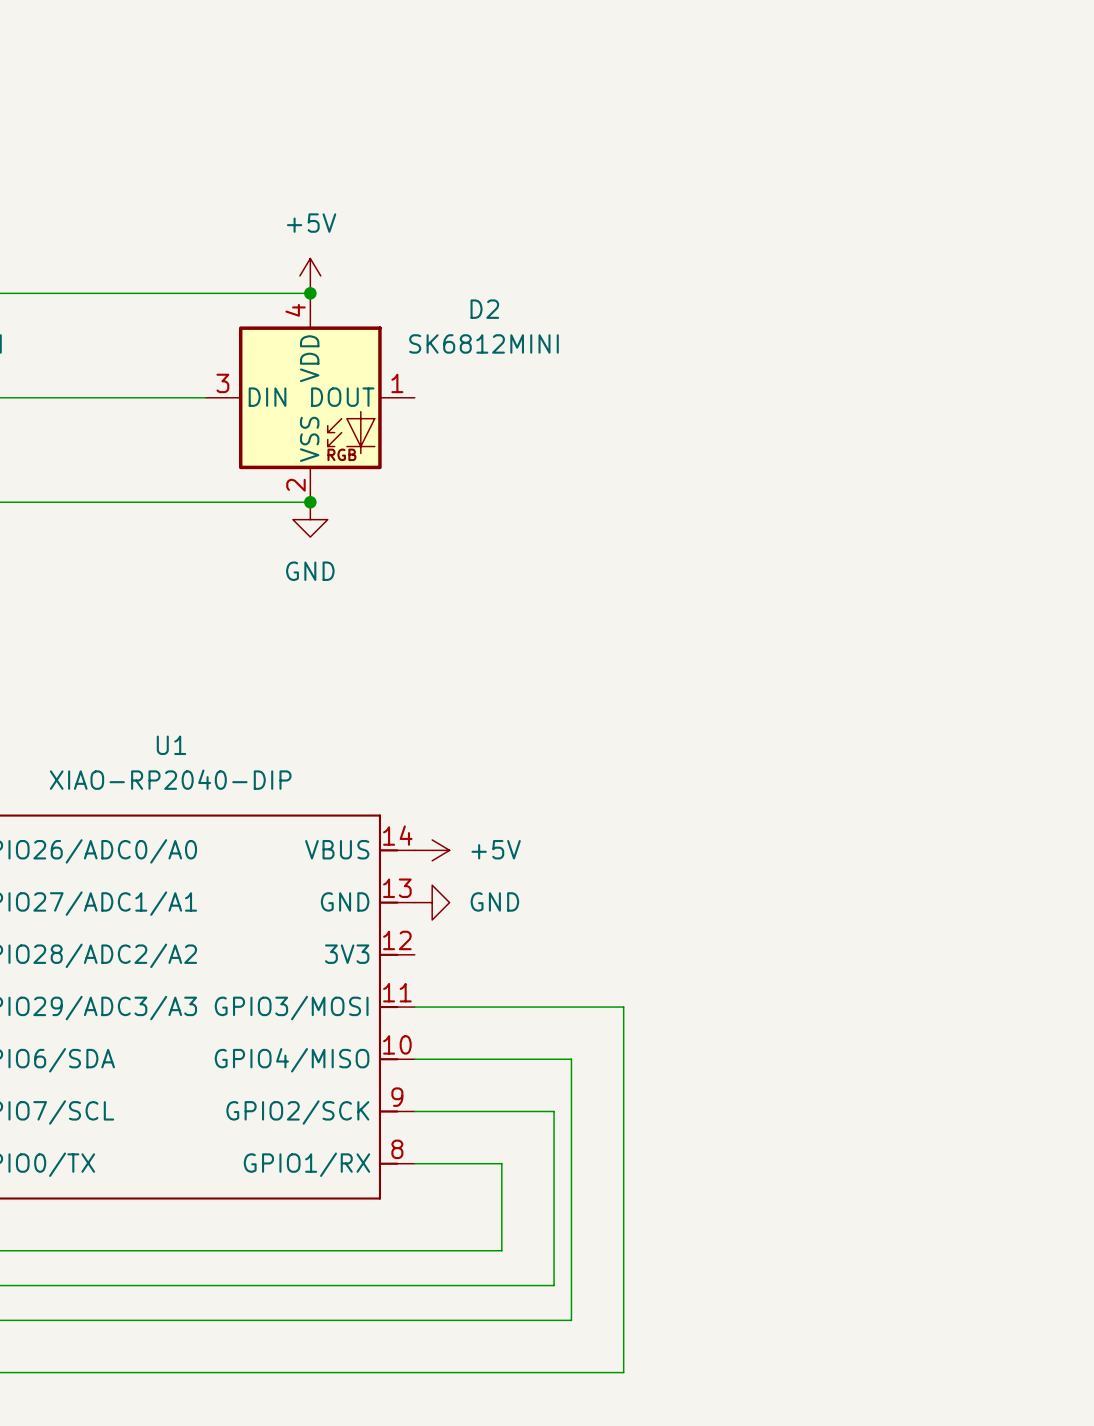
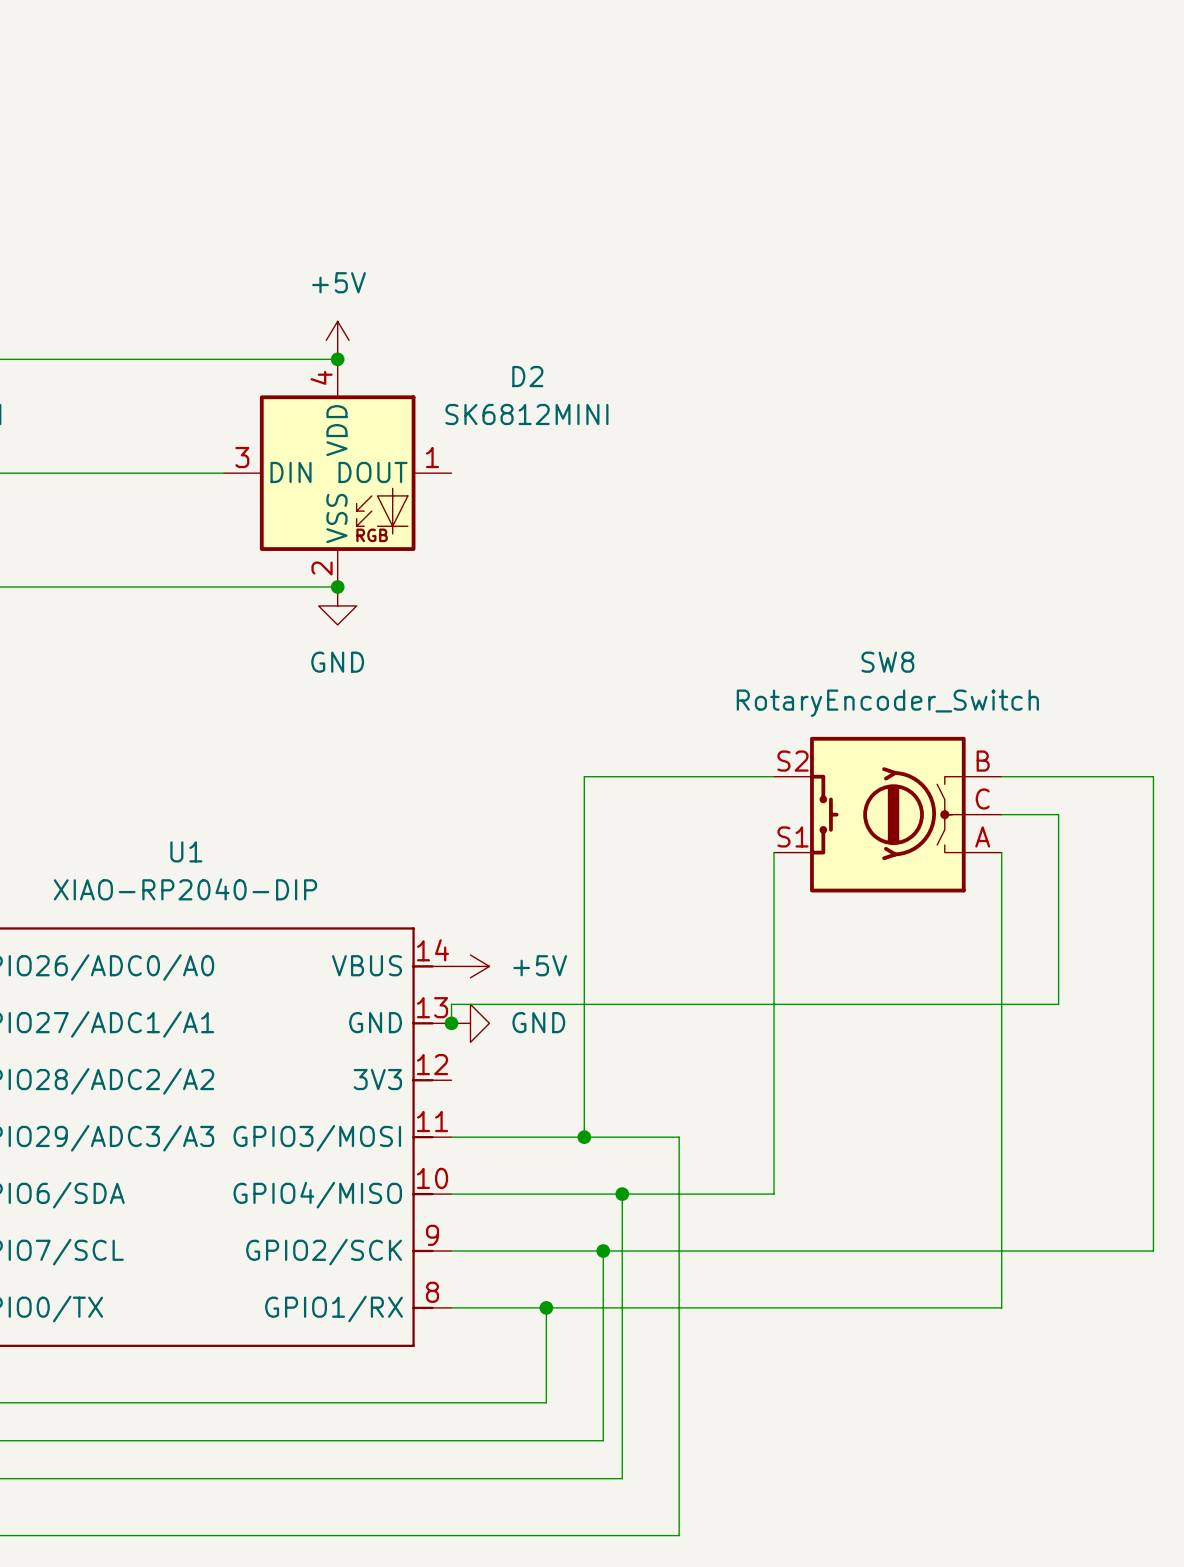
wire: none -> (774, 776) (584, 776) (584, 1137)
wire: none -> (1001, 776) (1153, 776) (1153, 1251) (603, 1251)
SW8: none -> RotaryEncoder_Switch (887, 814)
wire: none -> (1001, 814) (1058, 814) (1058, 1004) (451, 1004) (451, 1023)
wire: none -> (774, 852) (774, 1194) (622, 1194)
wire: none -> (1001, 852) (1001, 1307) (546, 1307)
junction: none -> (451, 1023)
junction: none -> (584, 1137)
junction: none -> (622, 1194)
junction: none -> (603, 1251)
junction: none -> (546, 1307)

